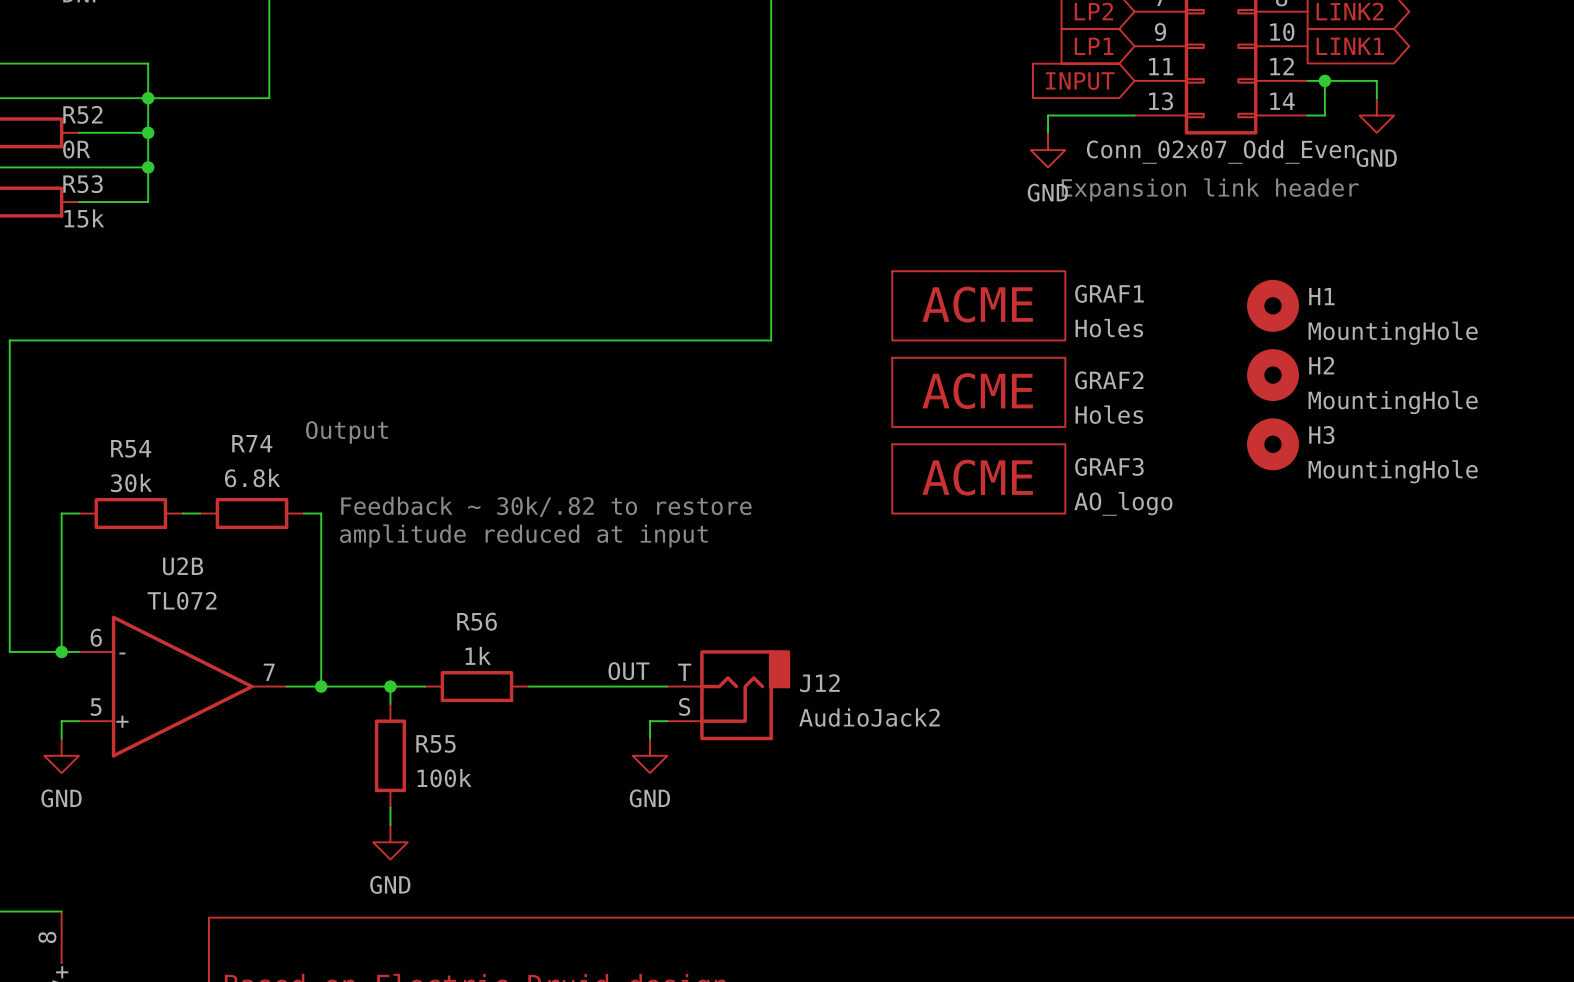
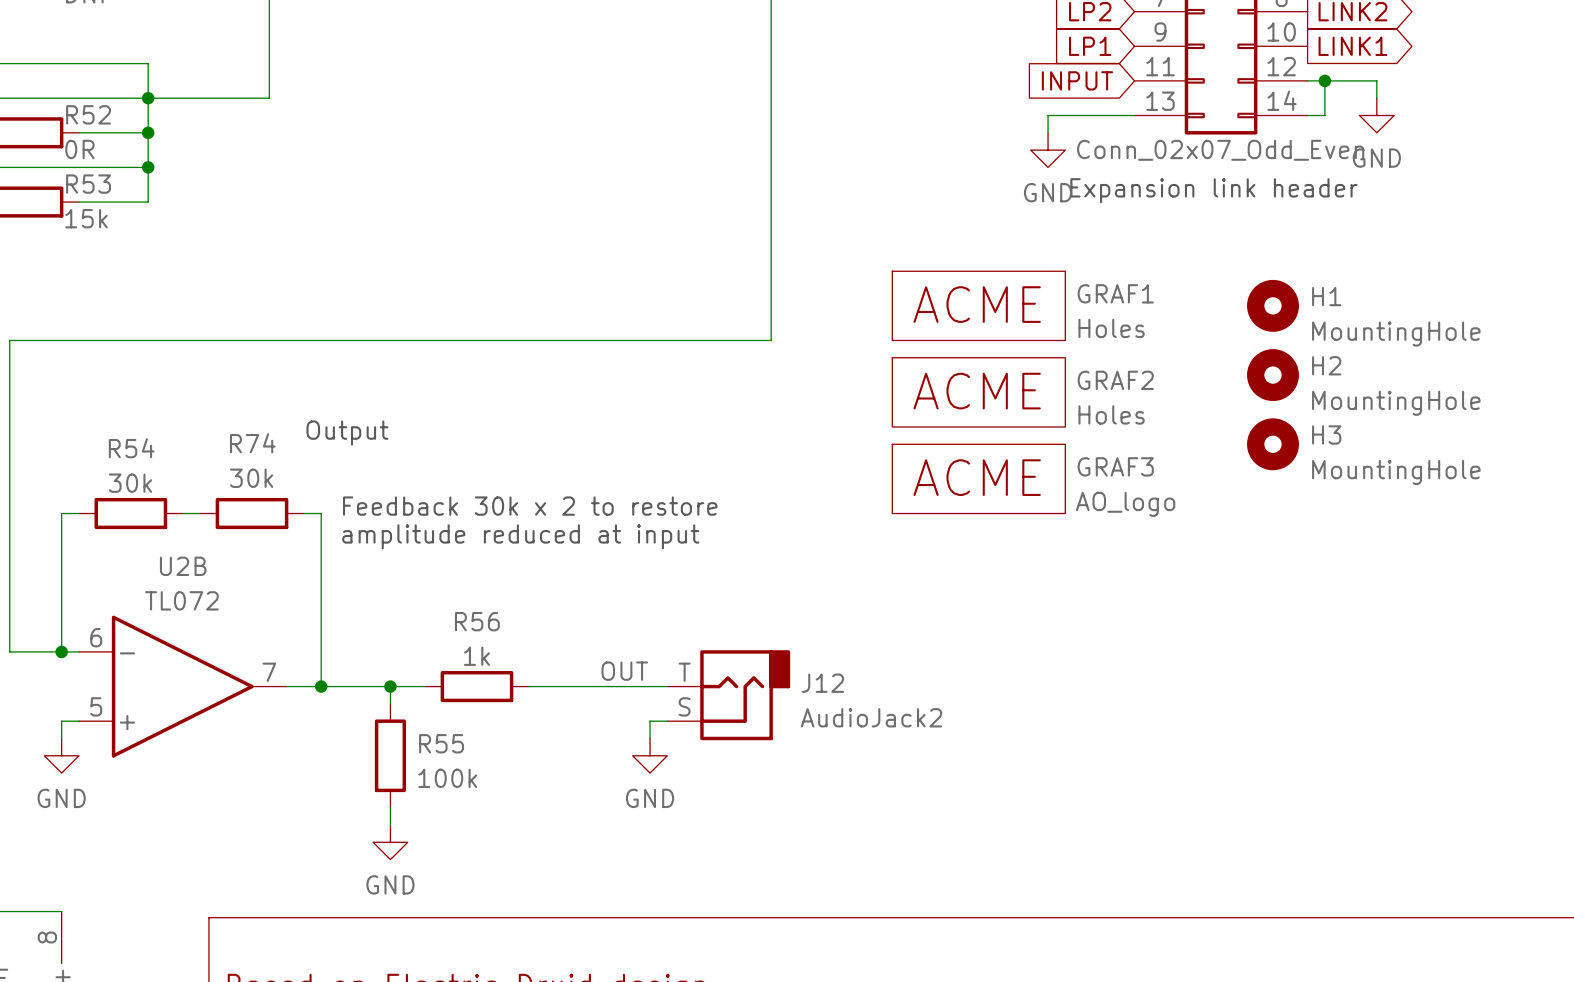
R74 value: 6.8k (252, 478) -> 30k (251, 478)
text: Feedback ~ 30k/.82 to restore (546, 506) -> Feedback 30k x 2 to restore (530, 506)

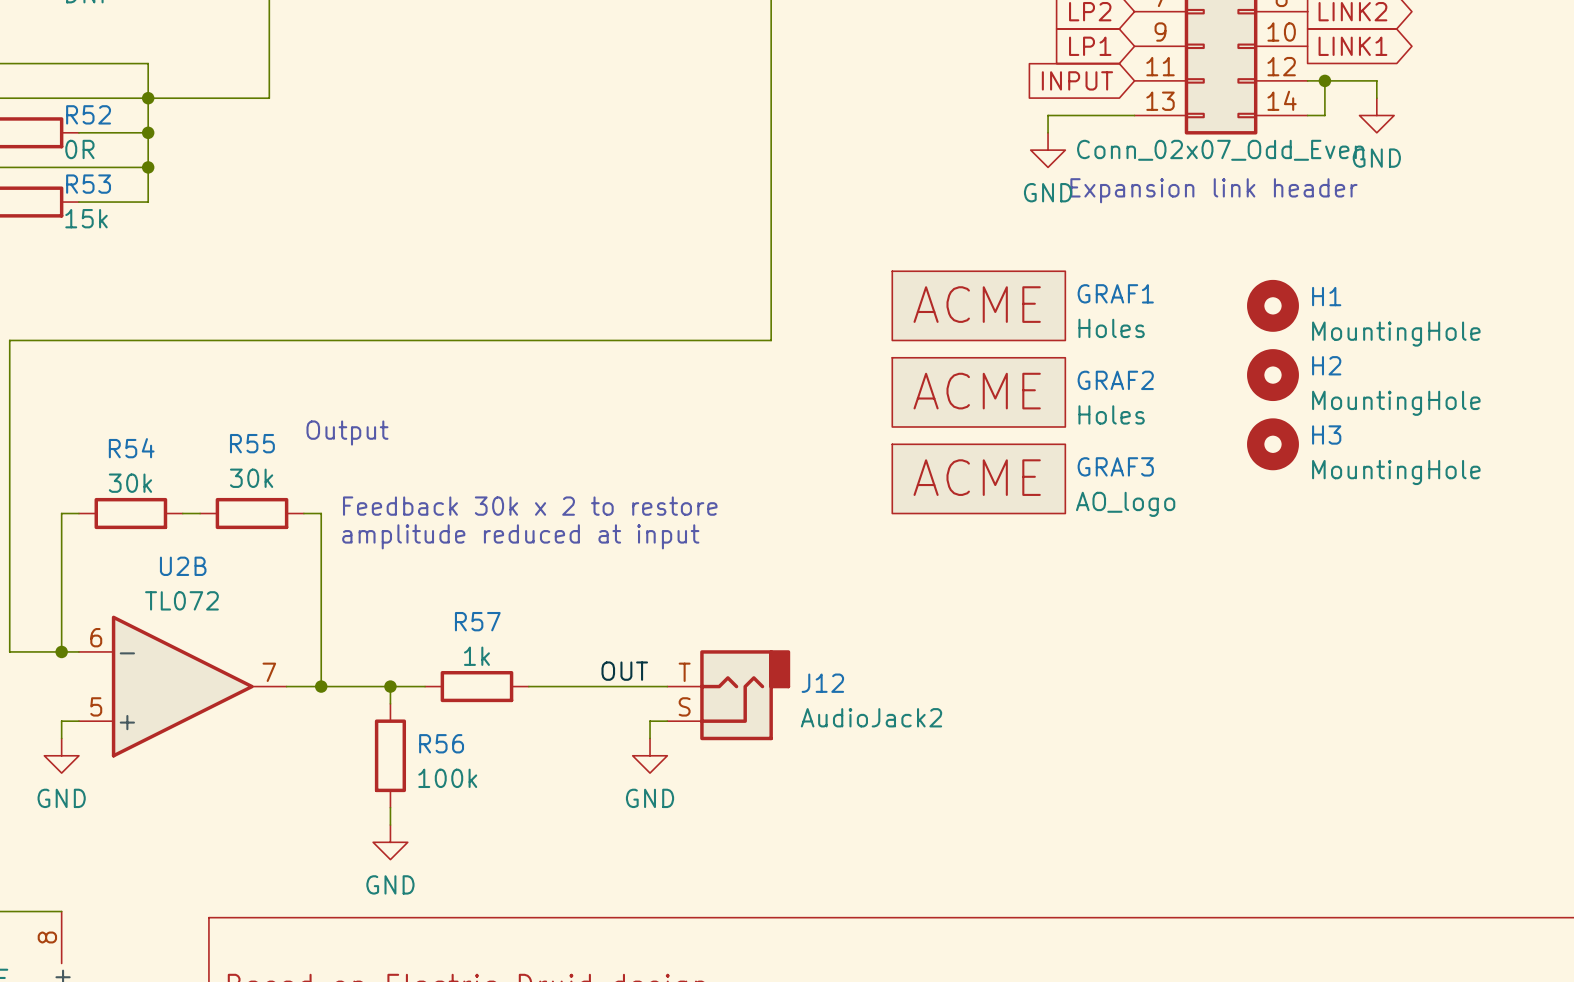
R74 name: R74 (252, 443) -> R55 (252, 443)
R56 name: R56 (477, 621) -> R57 (477, 621)
R55 name: R55 (441, 743) -> R56 (441, 743)

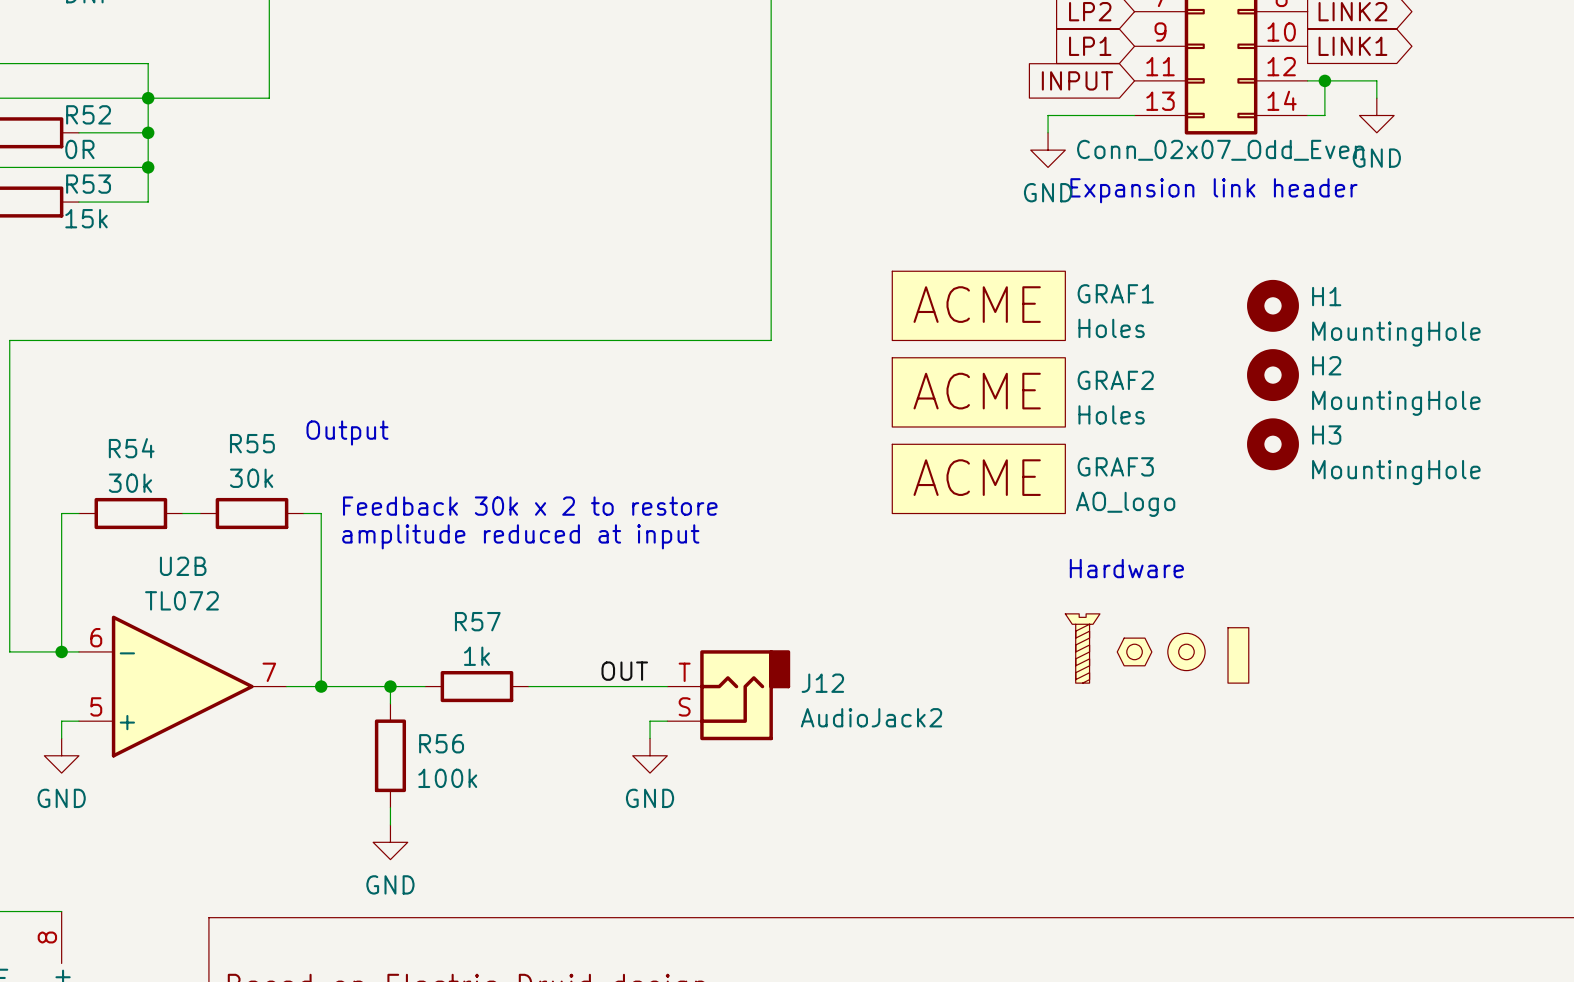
text: none -> Hardware (1126, 568)
part: none -> (1082, 648)
part: none -> (1134, 651)
part: none -> (1186, 651)
part: none -> (1238, 655)

